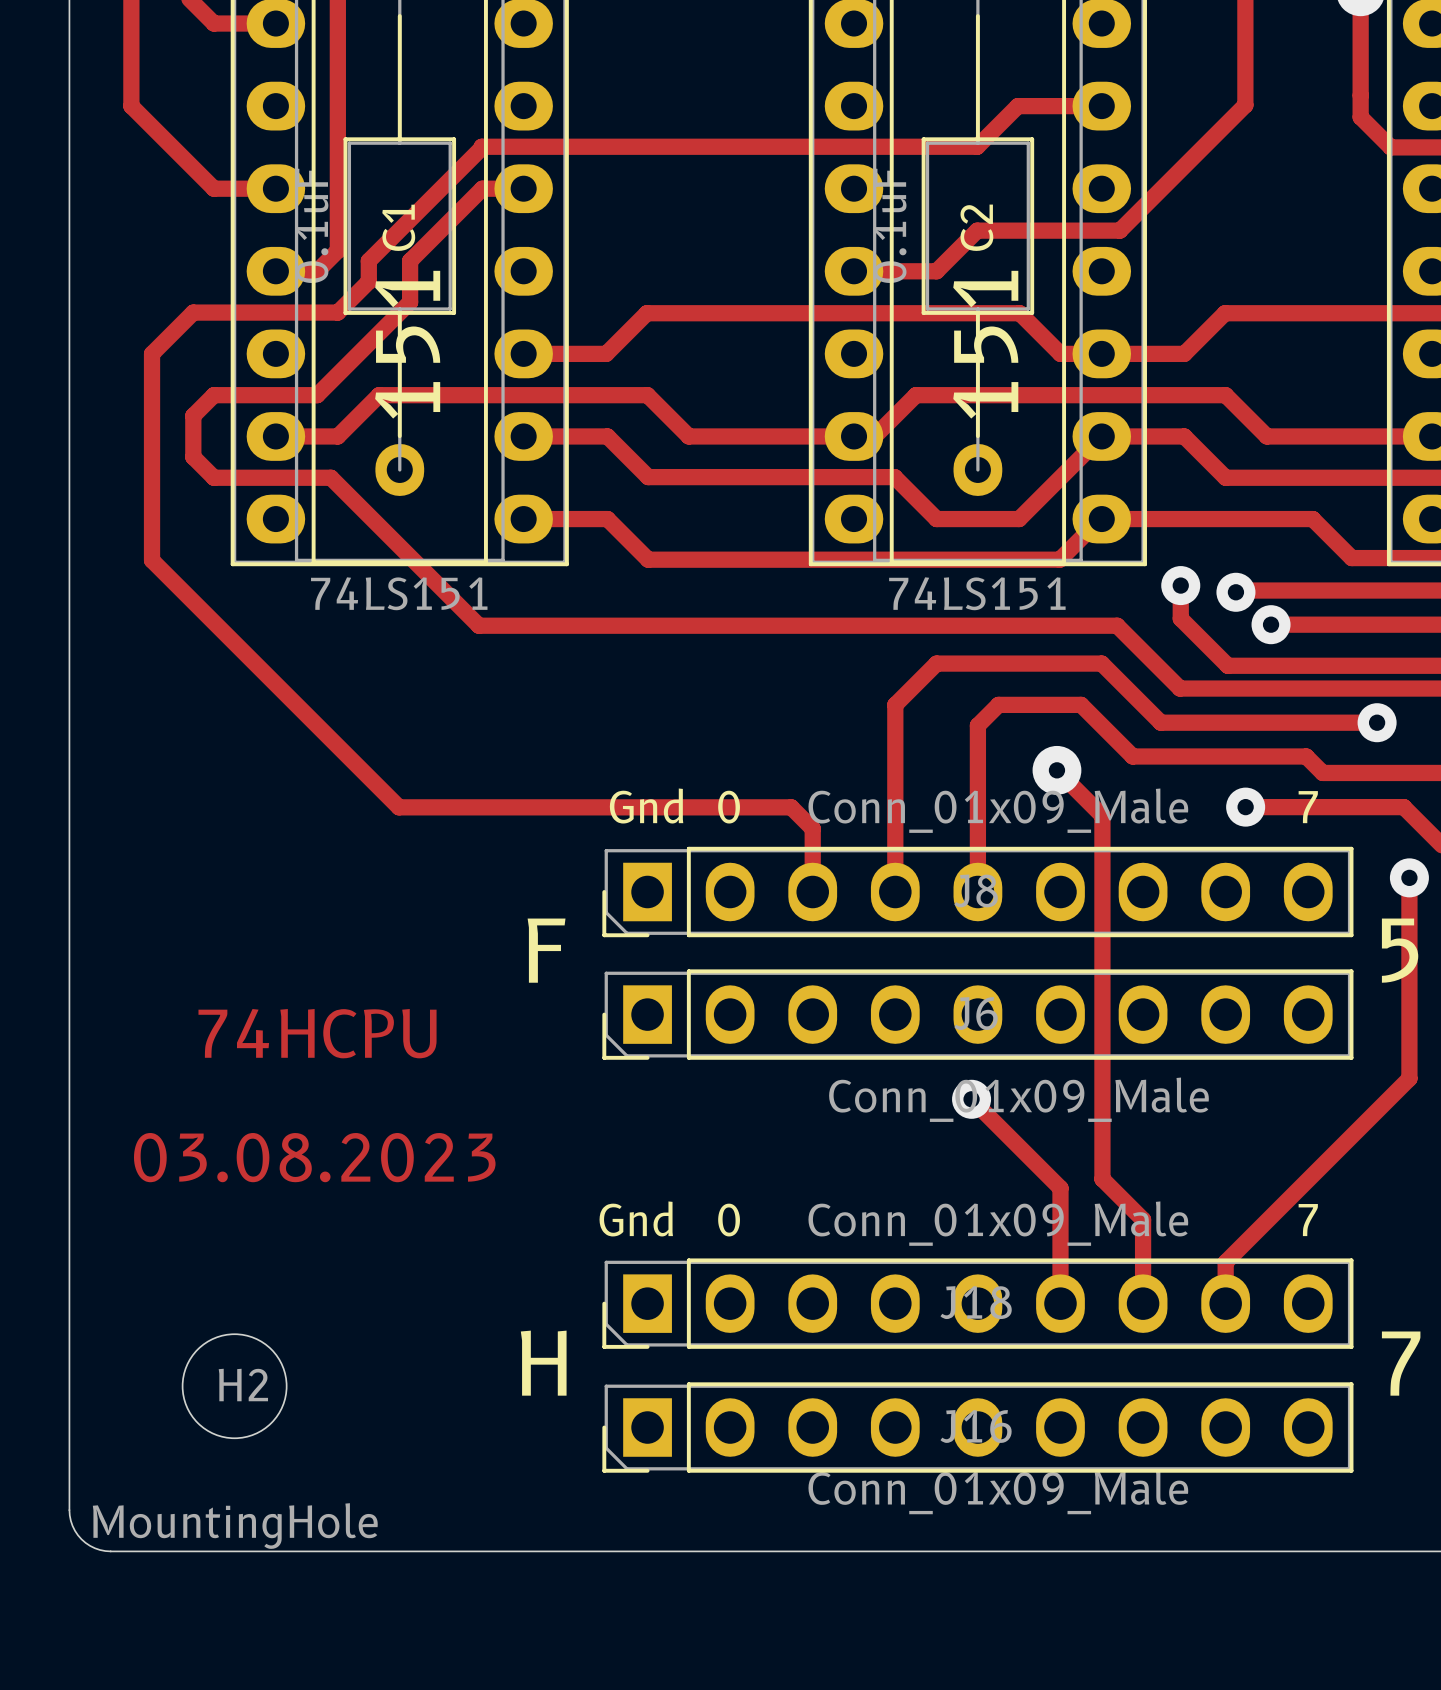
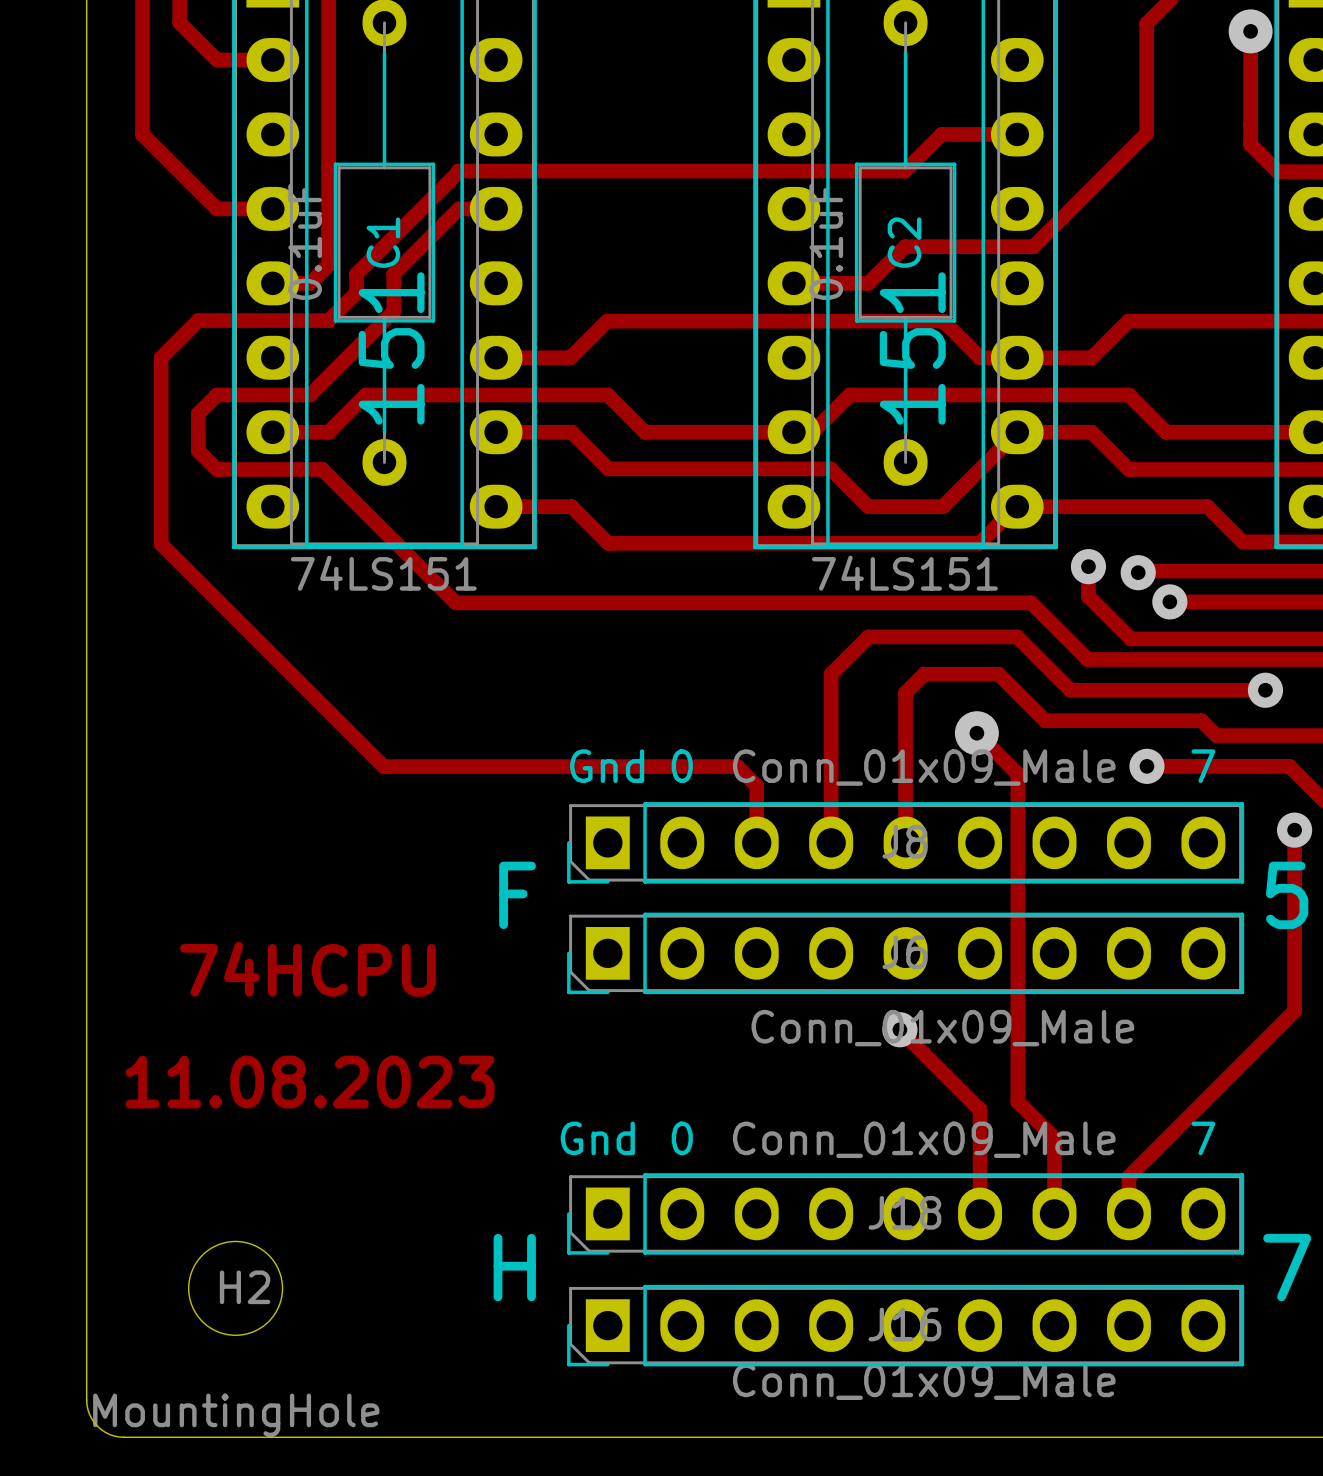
text: 03.08.2023 (314, 1157) -> 11.08.2023 (310, 1082)

